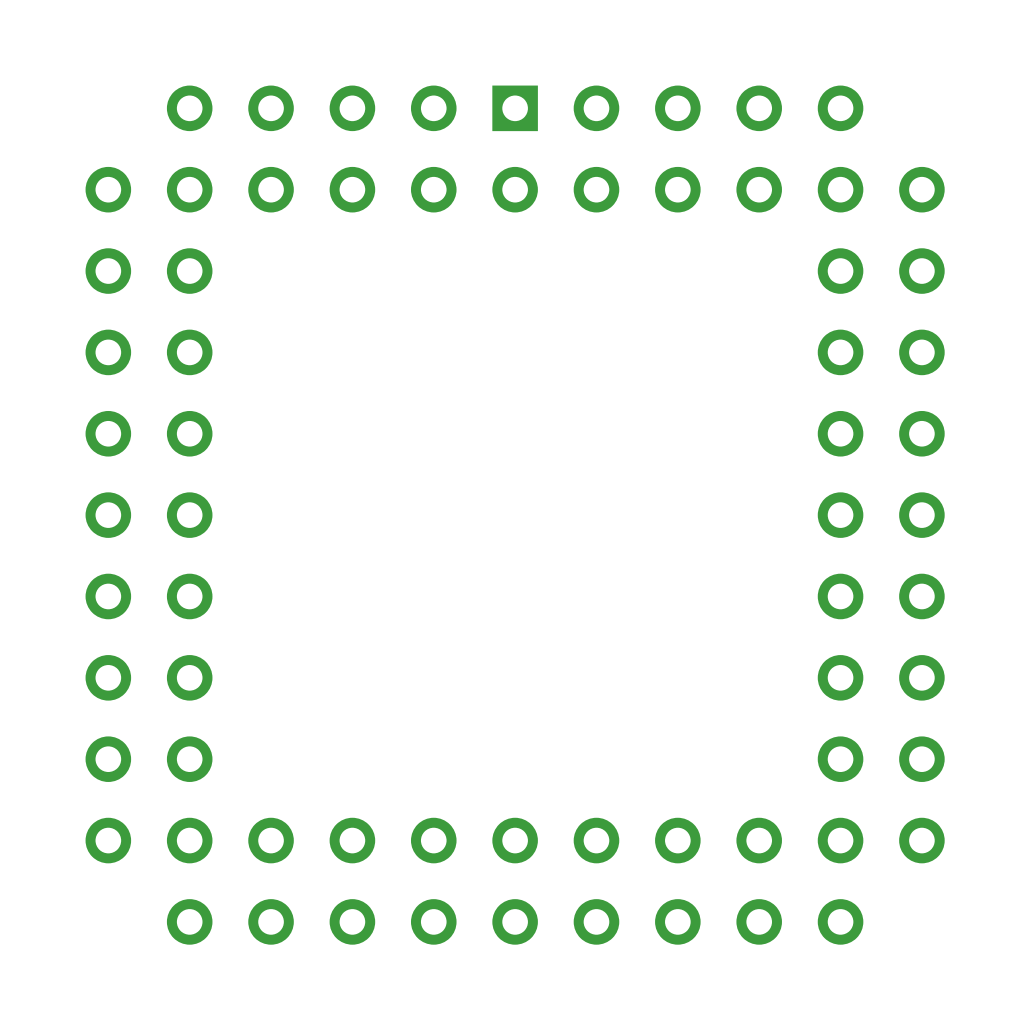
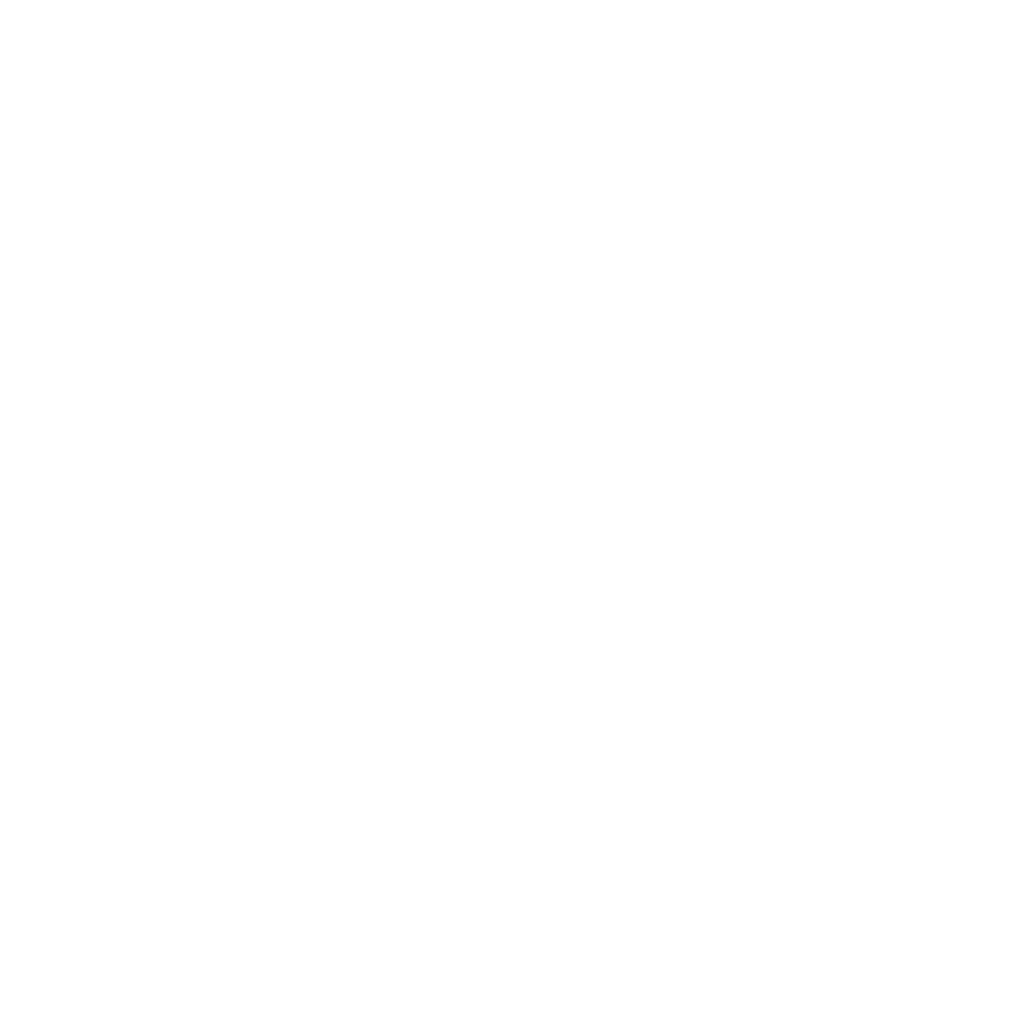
part: (515, 515) -> none

